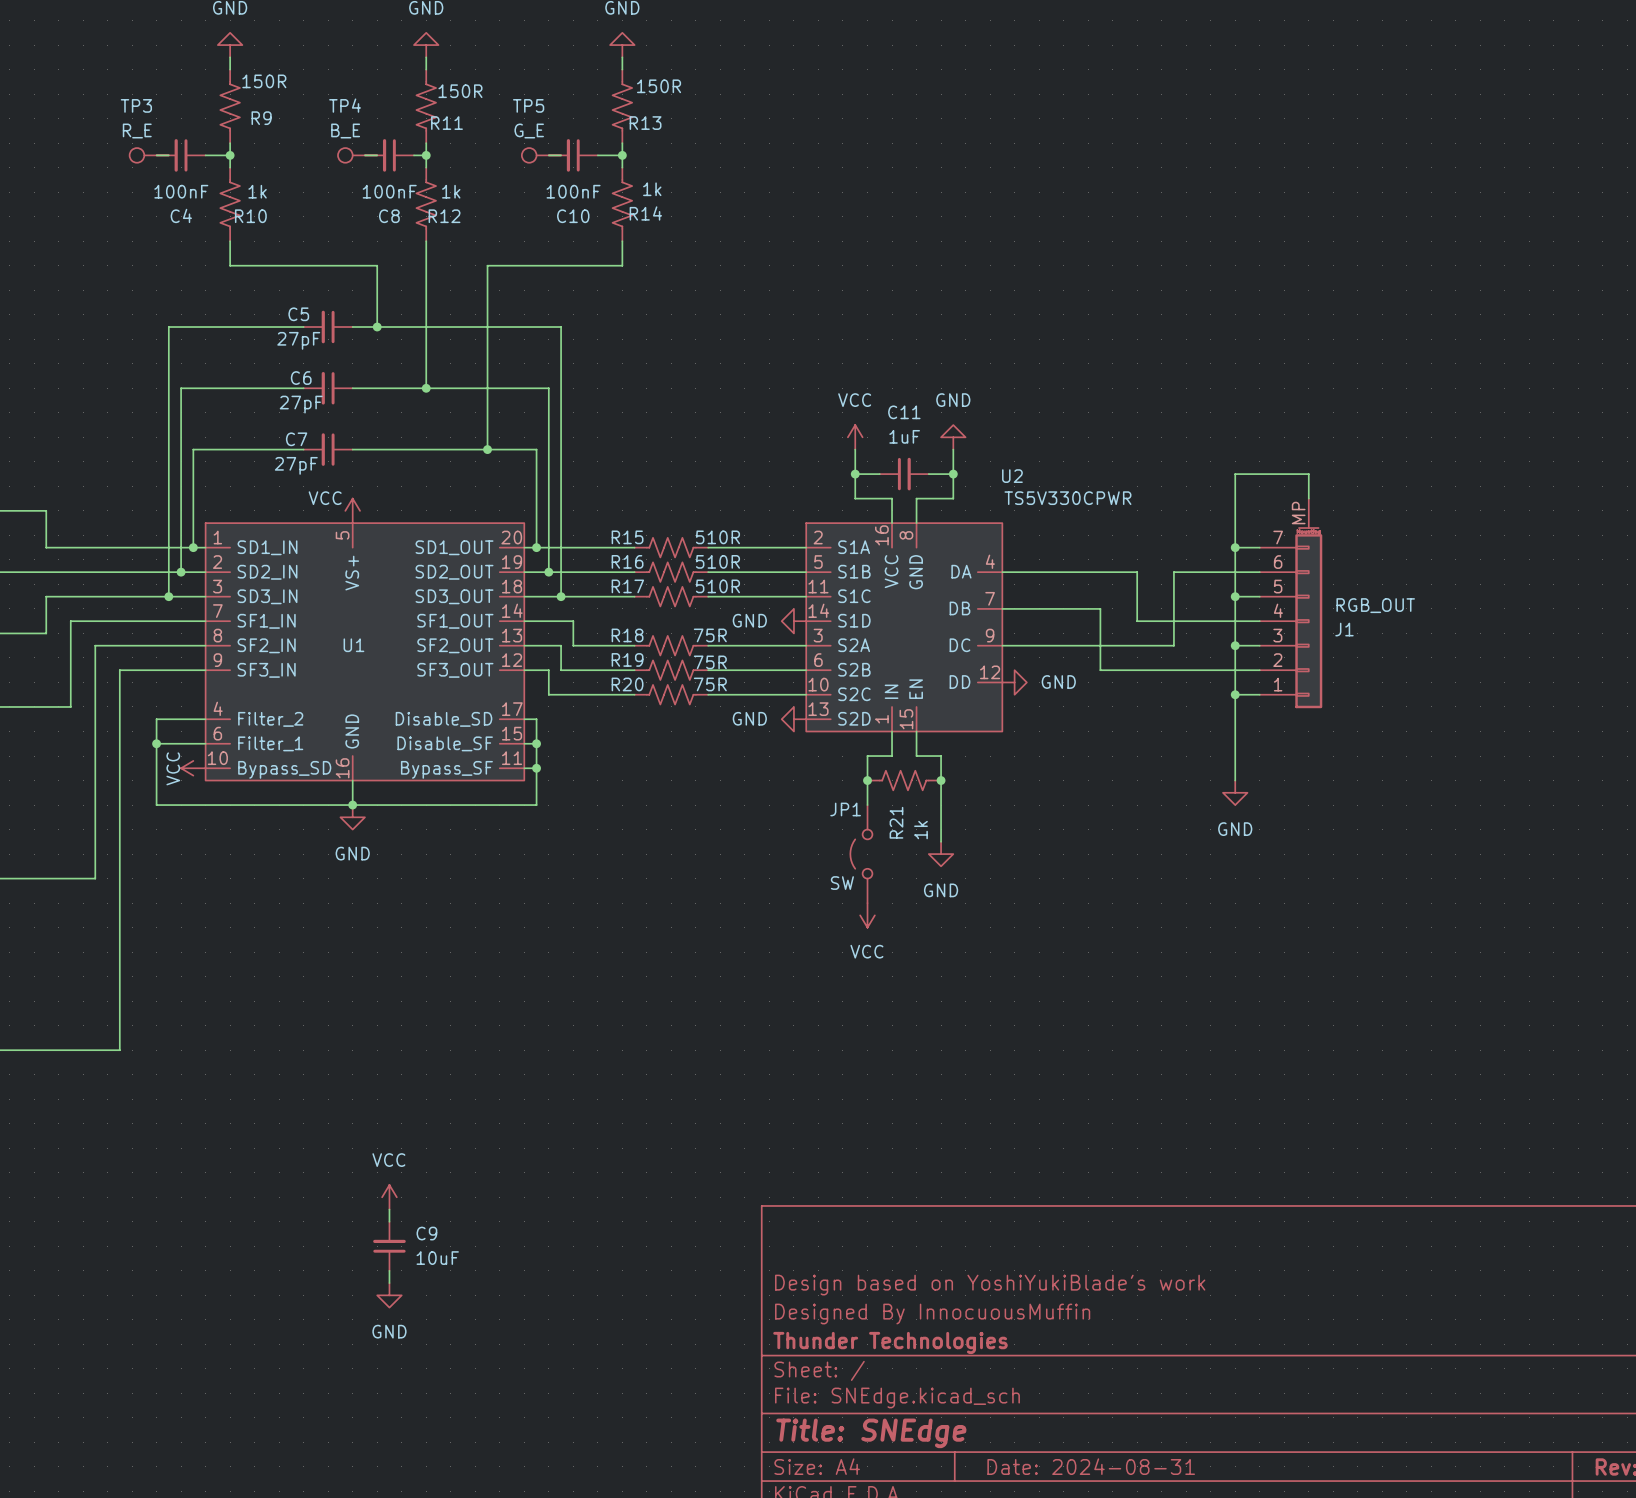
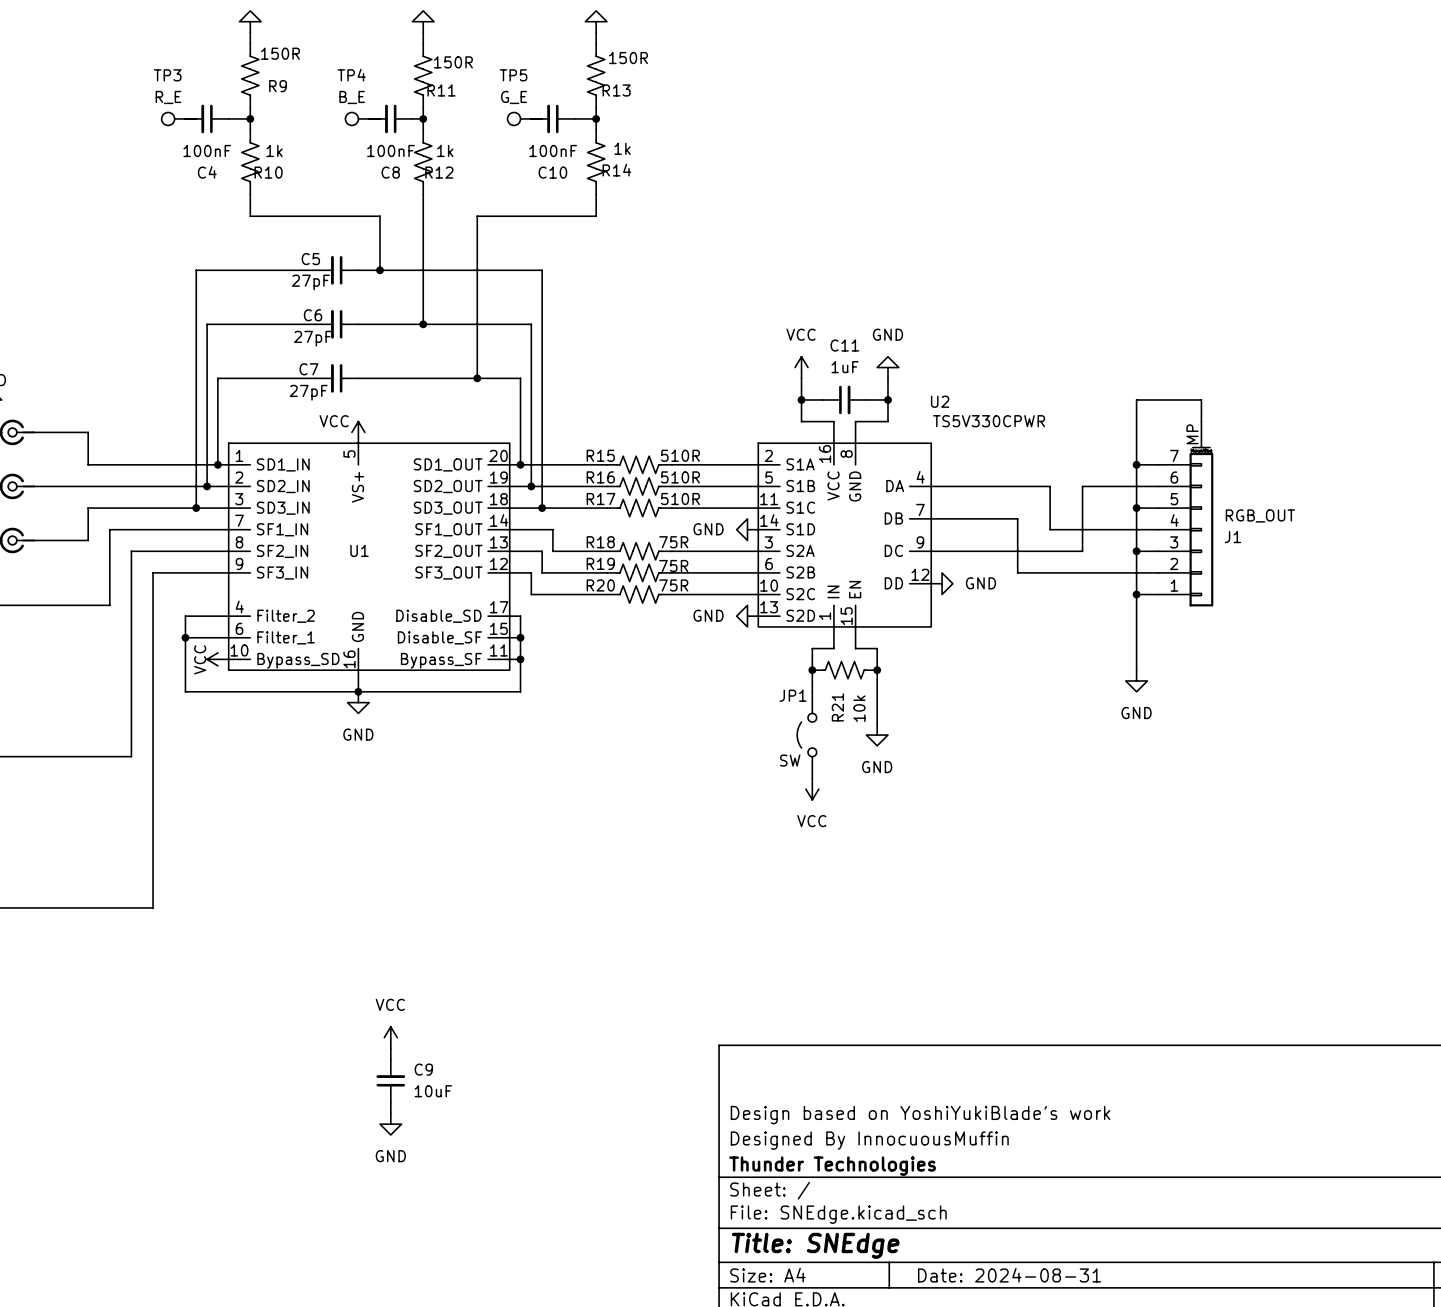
R21 value: 1k (920, 830) -> 10k (859, 708)

